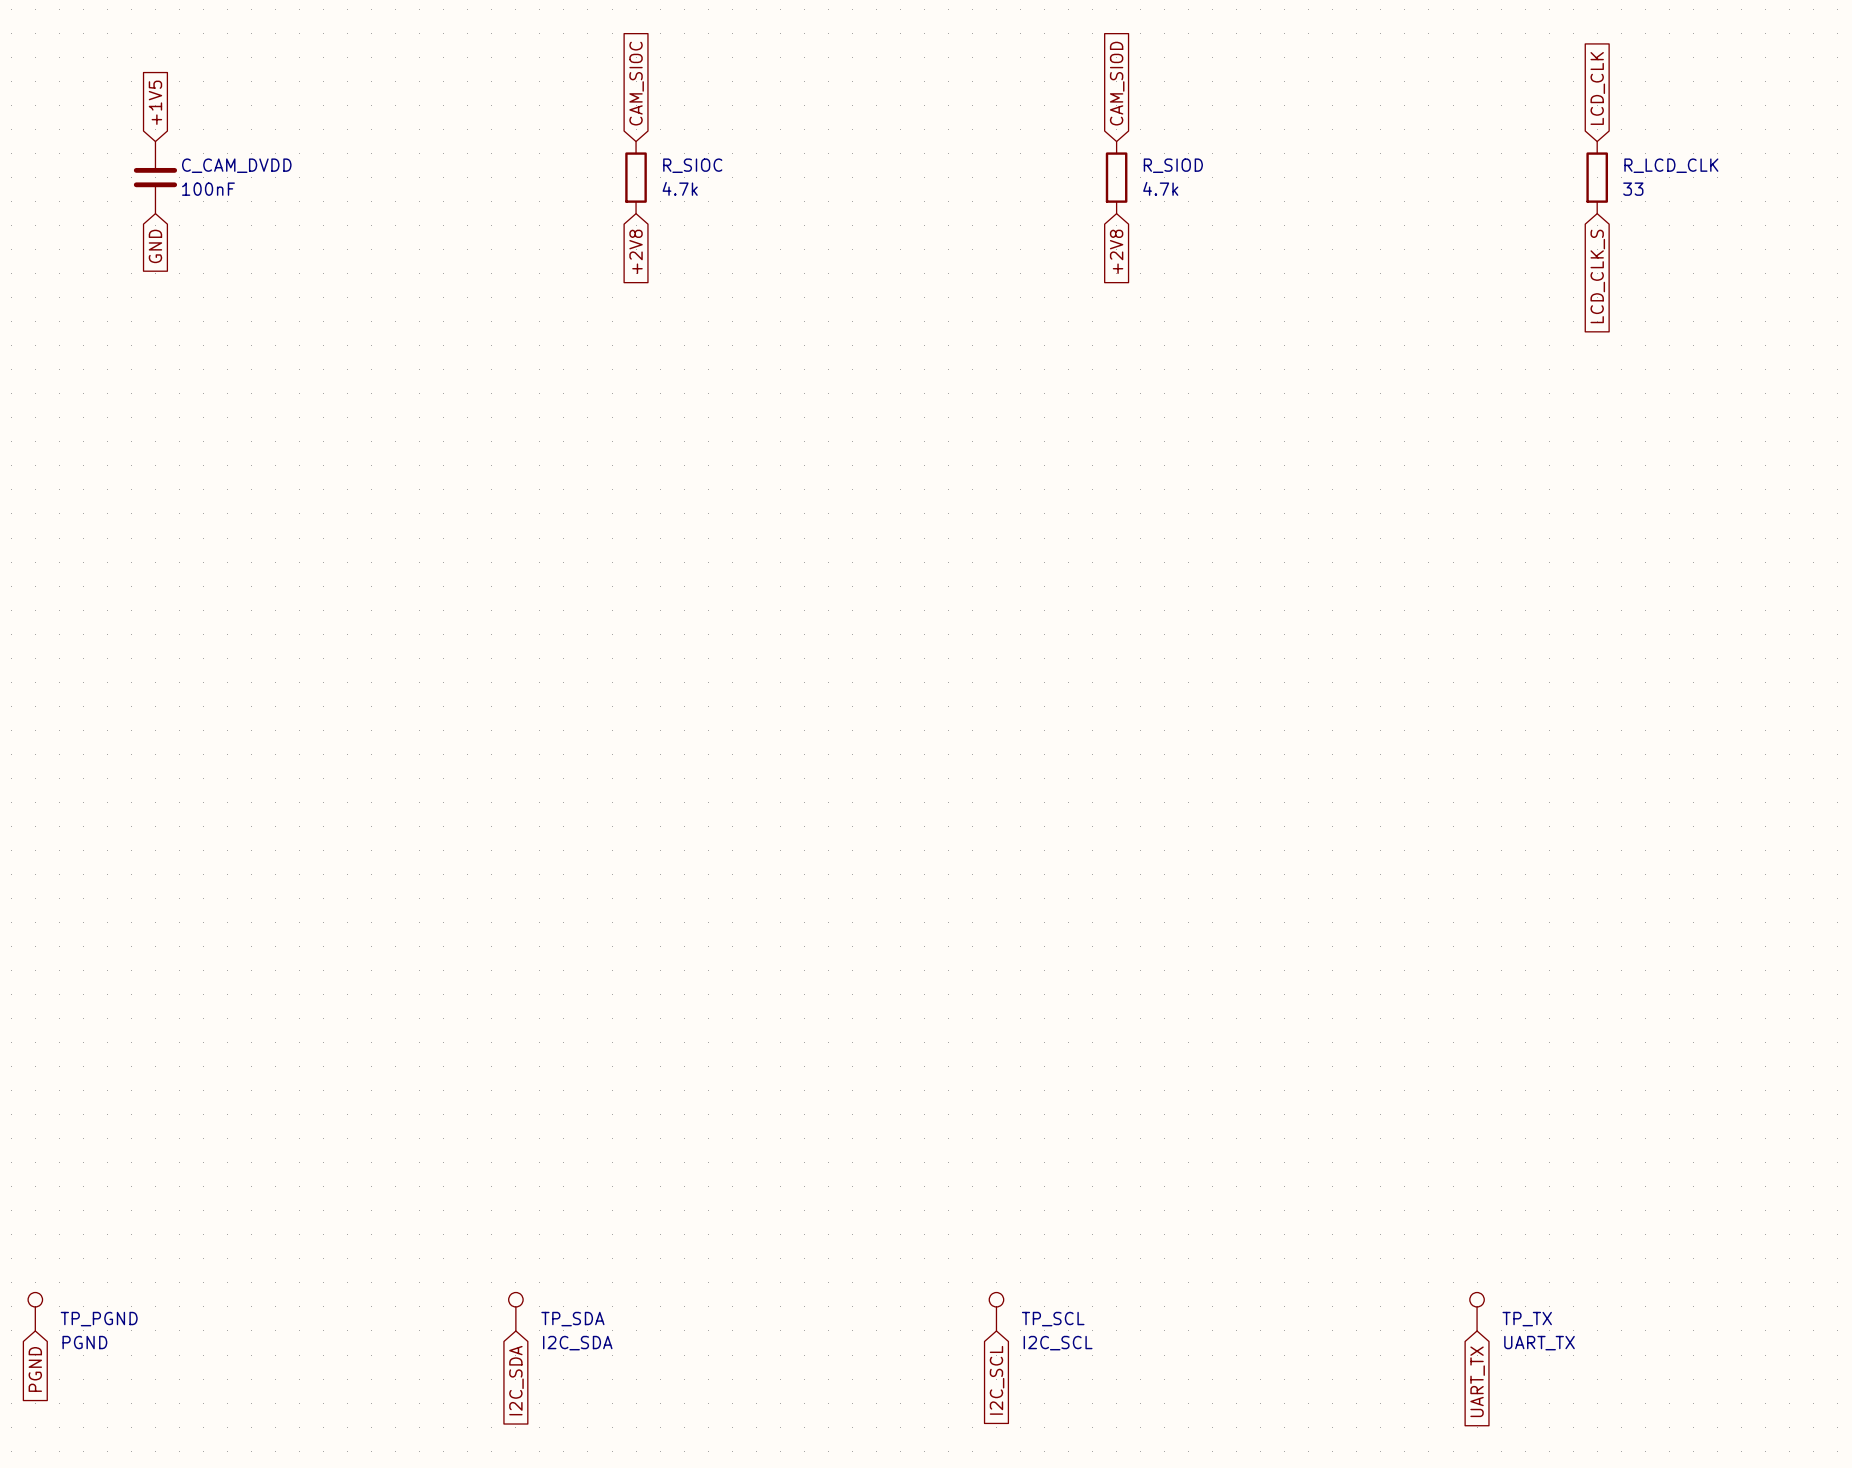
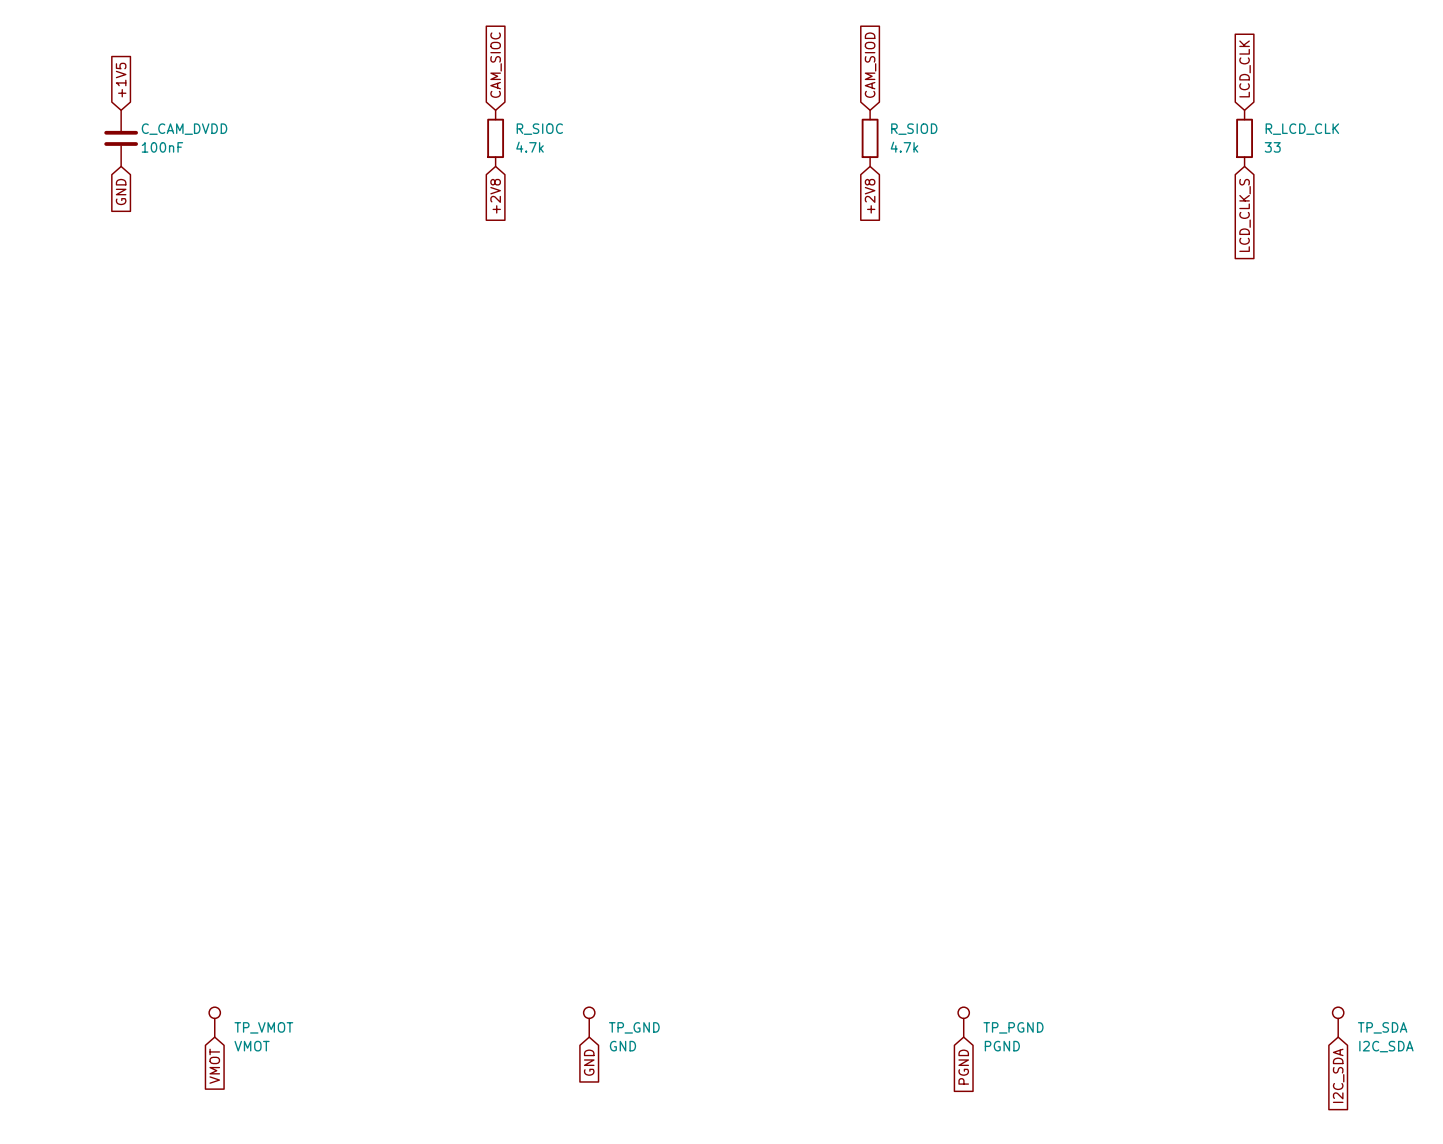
TP_PGND: PGND (35, 1311) -> none
TP_VMOT: none -> VMOT (214, 1022)
TP_SDA: I2C_SDA (515, 1311) -> none
TP_GND: none -> GND (589, 1022)
TP_SCL: I2C_SCL (996, 1311) -> none
TP_PGND: none -> PGND (963, 1022)
TP_TX: UART_TX (1477, 1311) -> none
TP_SDA: none -> I2C_SDA (1338, 1022)
global label: none -> GND (589, 1062)
global label: none -> VMOT (214, 1066)
global label: PGND (35, 1369) -> none
global label: none -> PGND (963, 1067)
global label: I2C_SDA (516, 1380) -> none
global label: I2C_SCL (997, 1380) -> none
global label: none -> I2C_SDA (1338, 1075)
global label: UART_TX (1477, 1381) -> none

